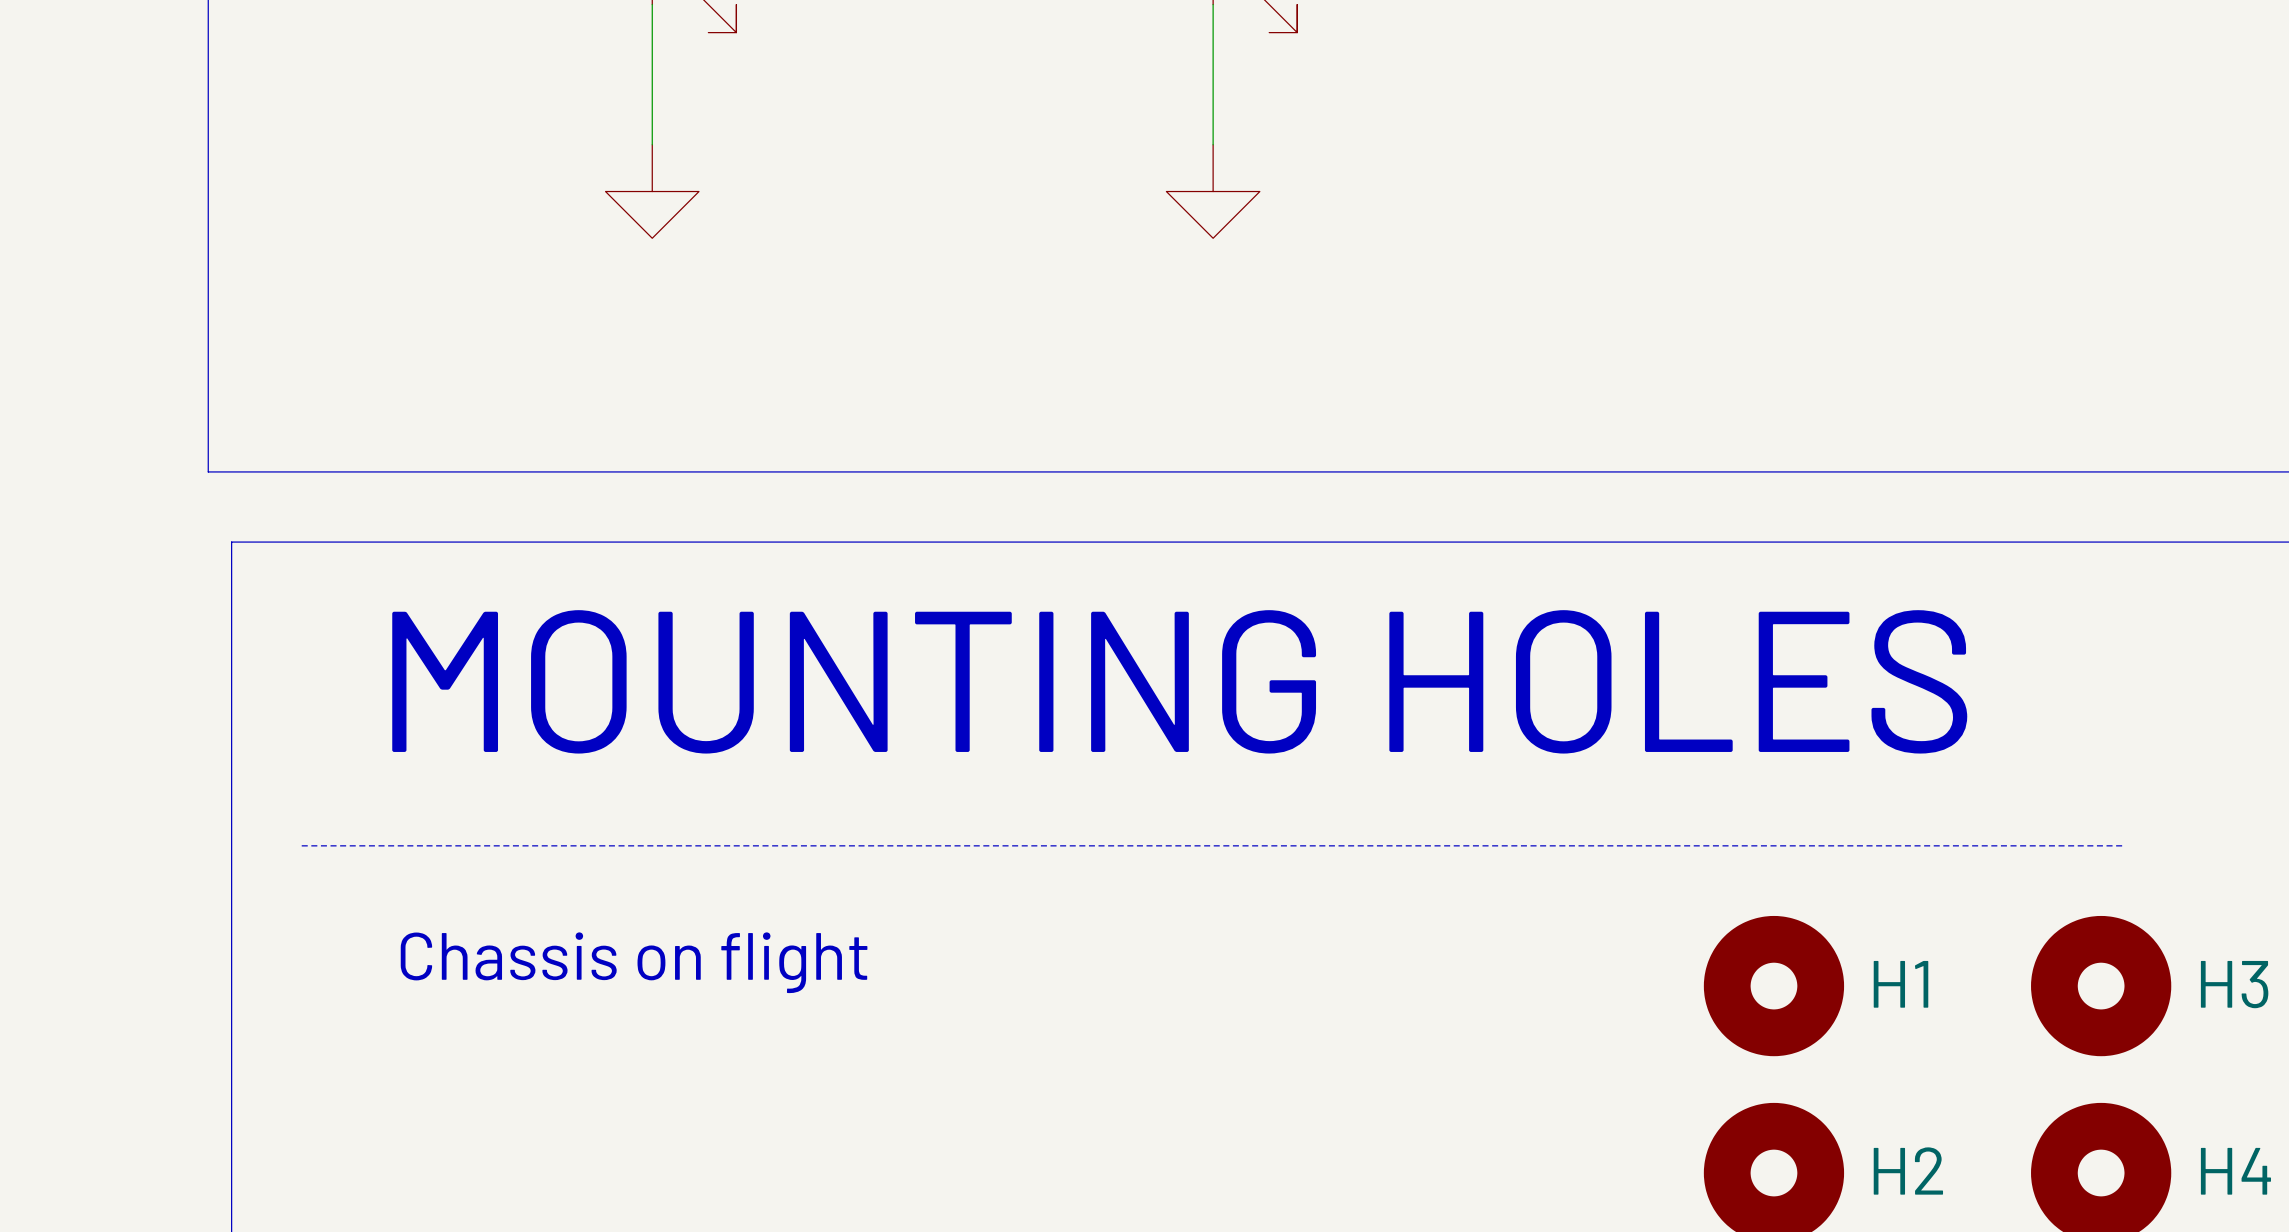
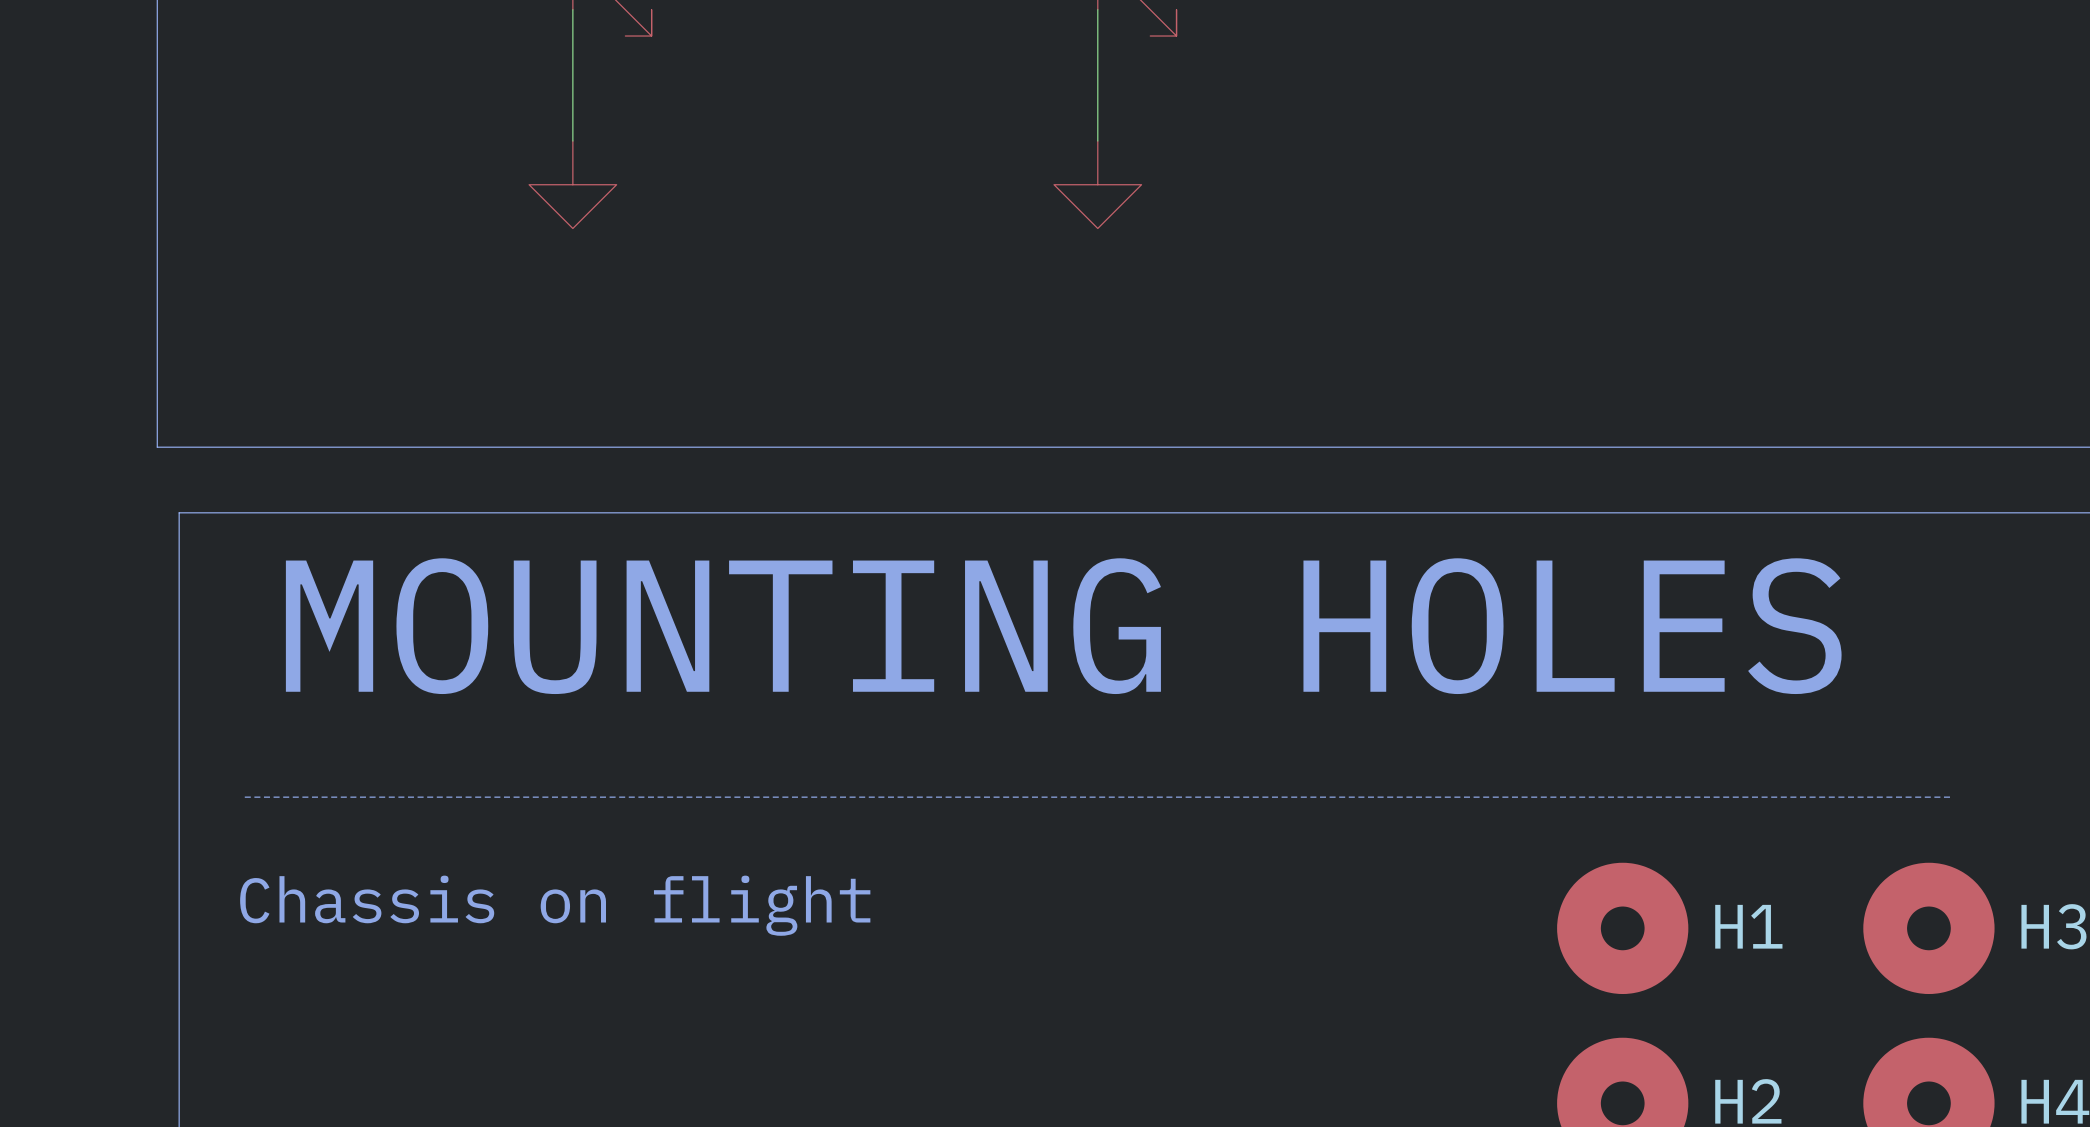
text position: MOUNTING HOLES (1179, 681) -> MOUNTING HOLES (1063, 626)

